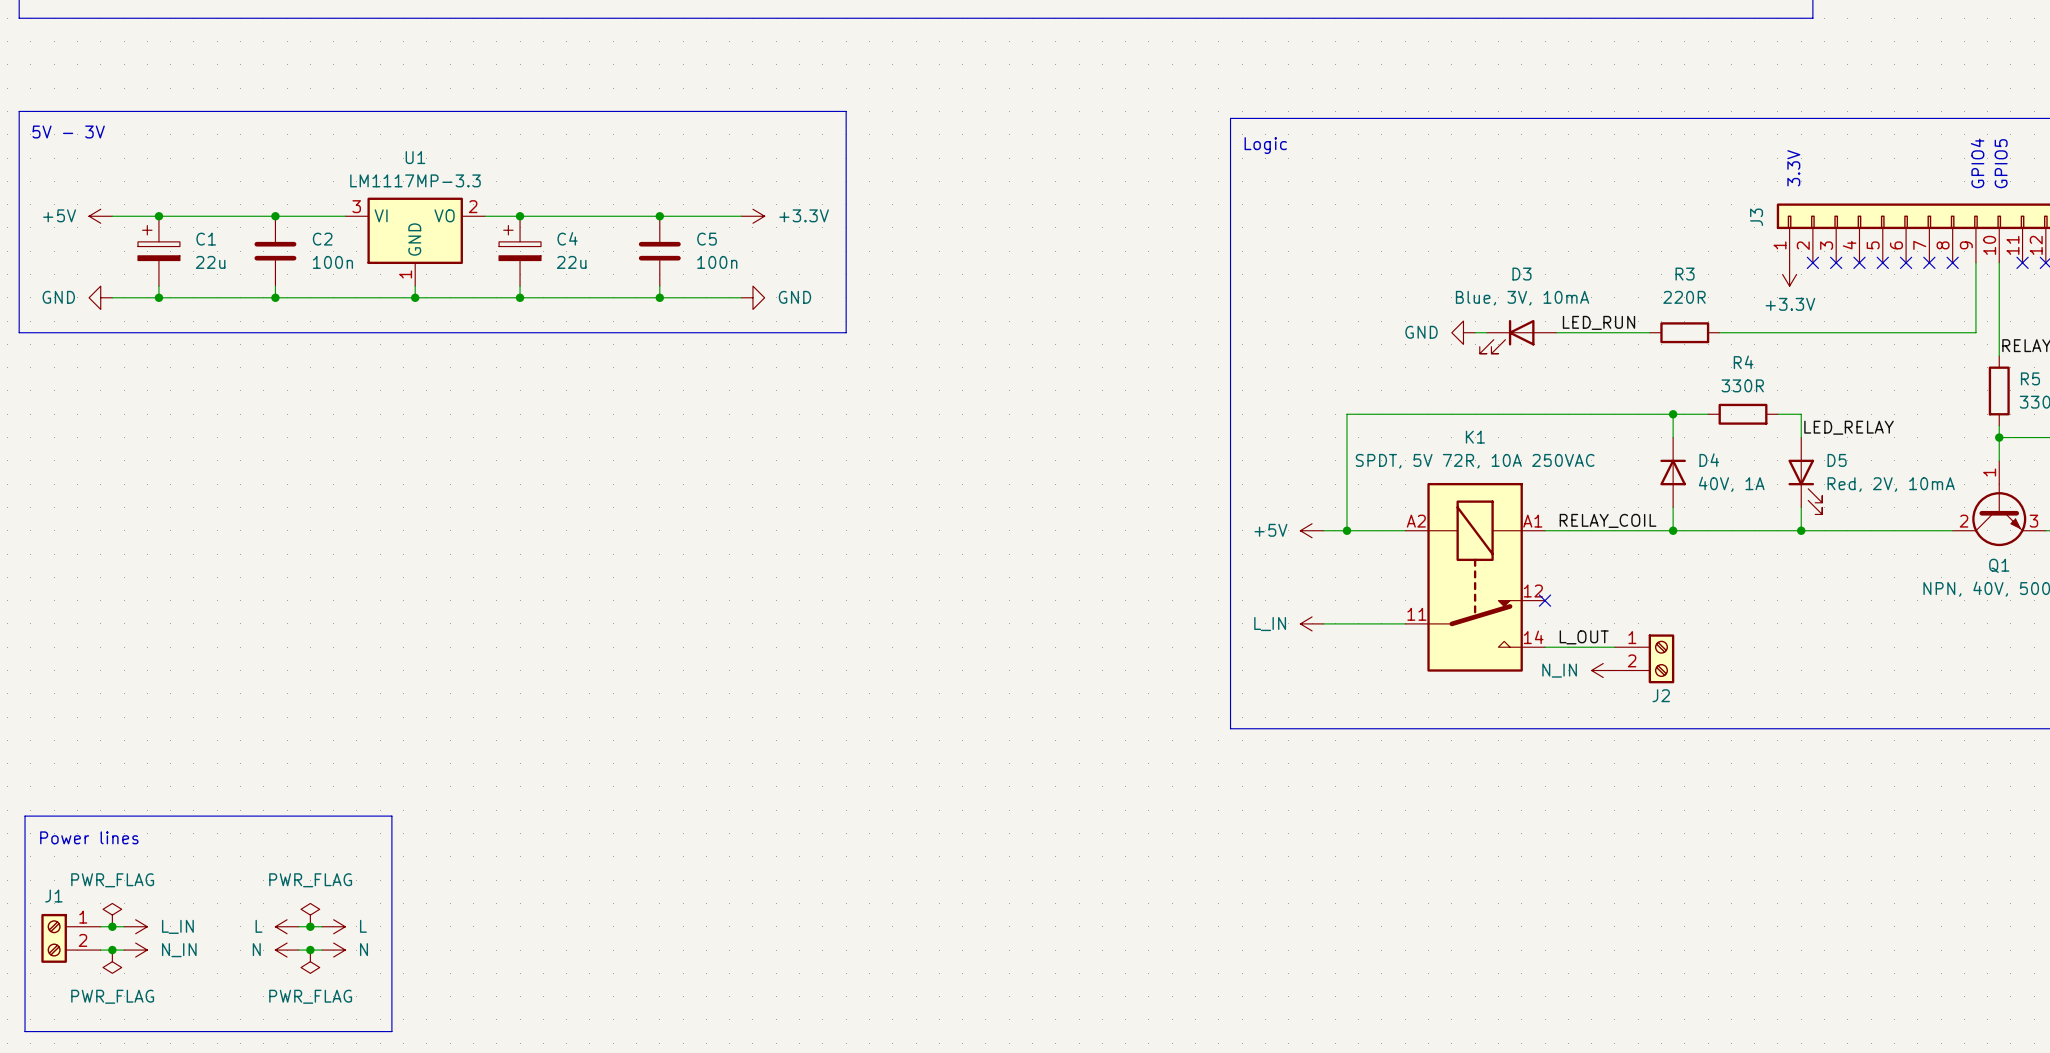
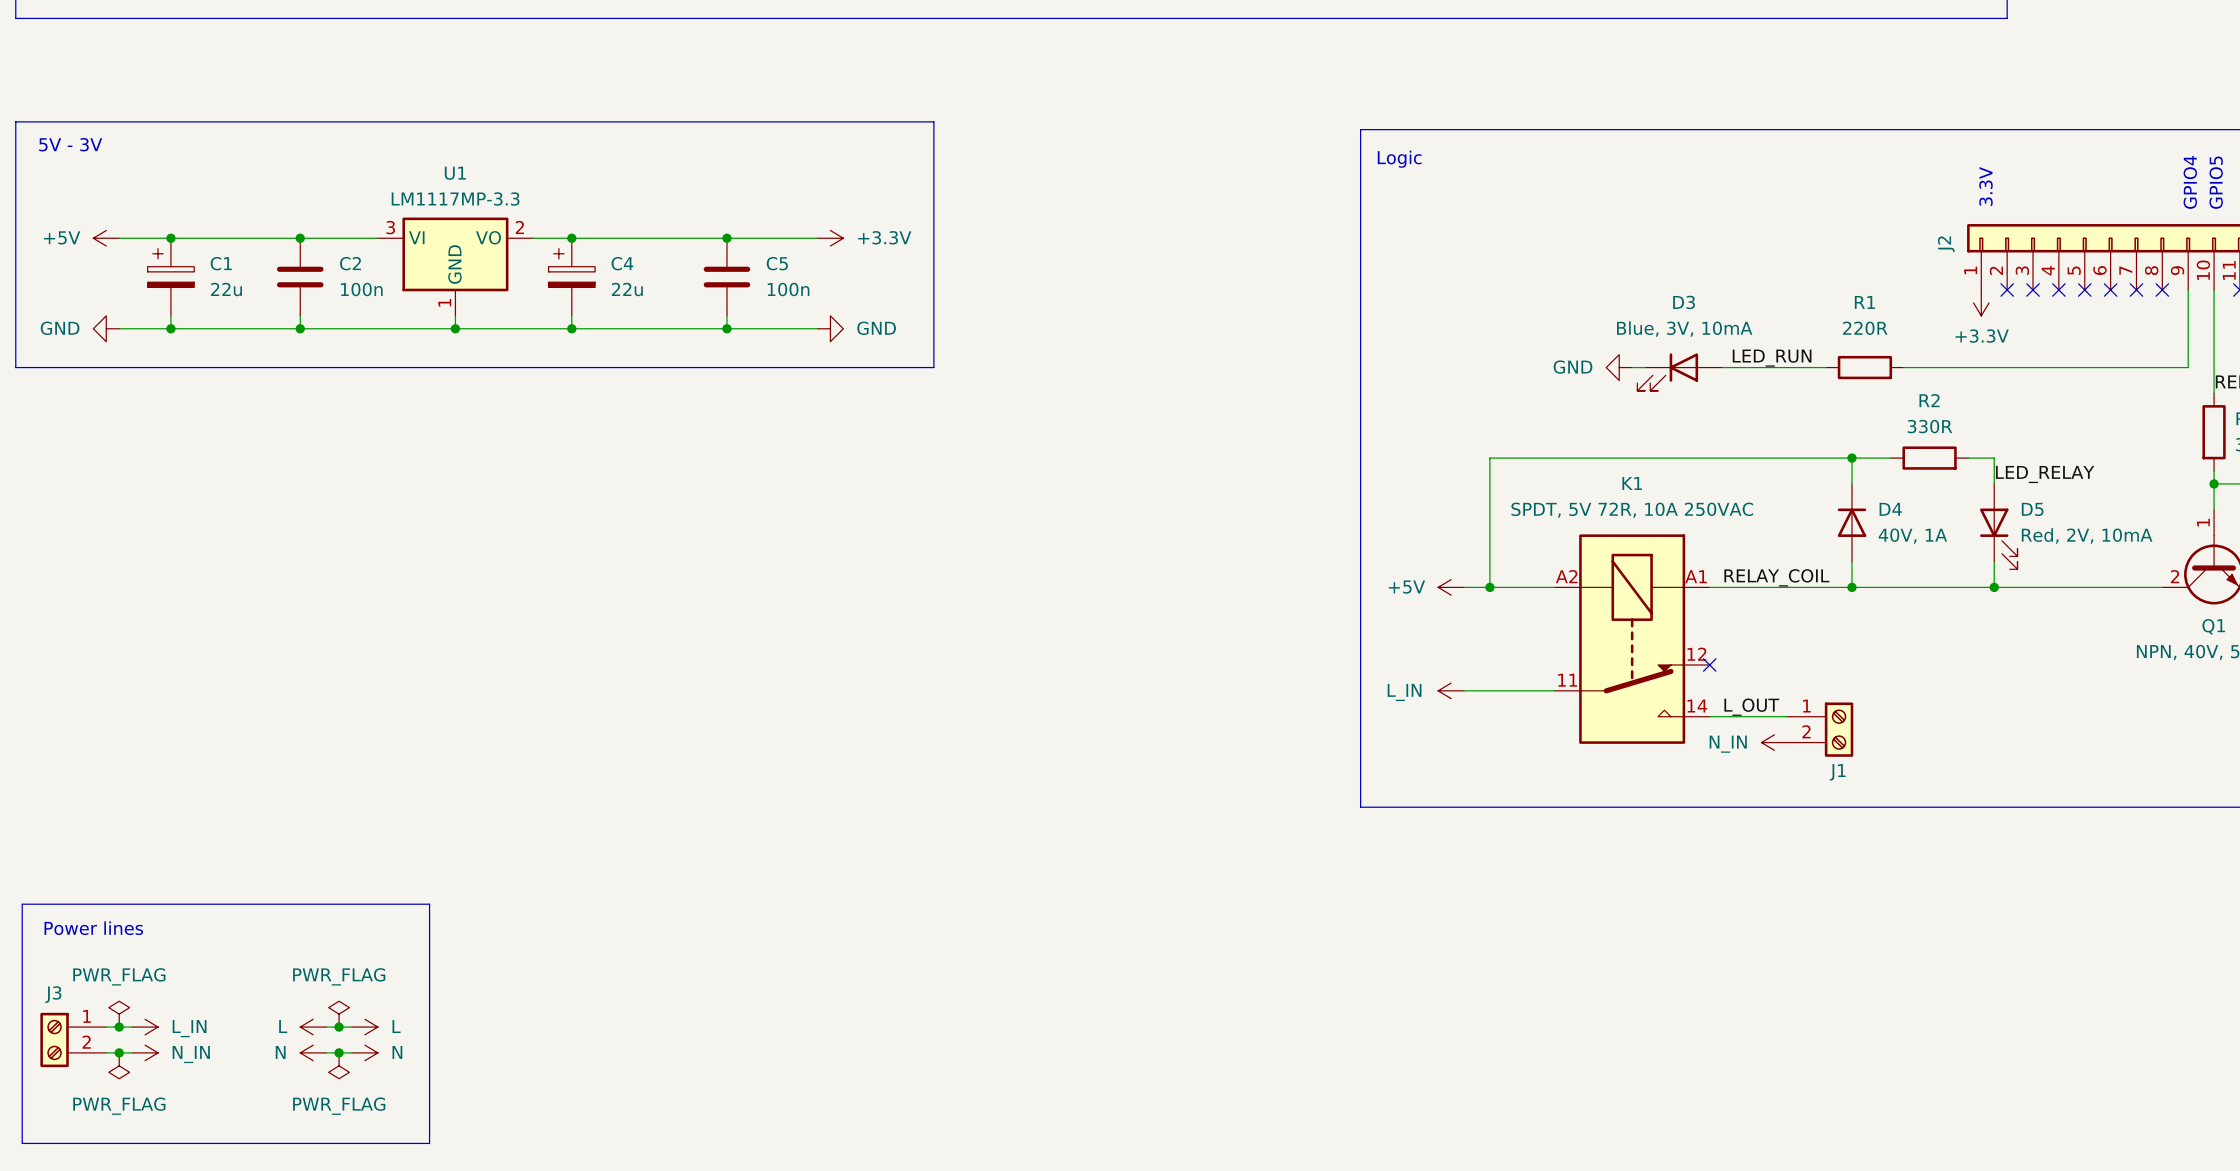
J3 name: J3 (1756, 217) -> J2 (1946, 244)
R3 name: R3 (1685, 274) -> R1 (1864, 302)
R4 name: R4 (1743, 362) -> R2 (1929, 400)
J2 name: J2 (1661, 695) -> J1 (1837, 772)
J1 name: J1 (53, 896) -> J3 (53, 994)

